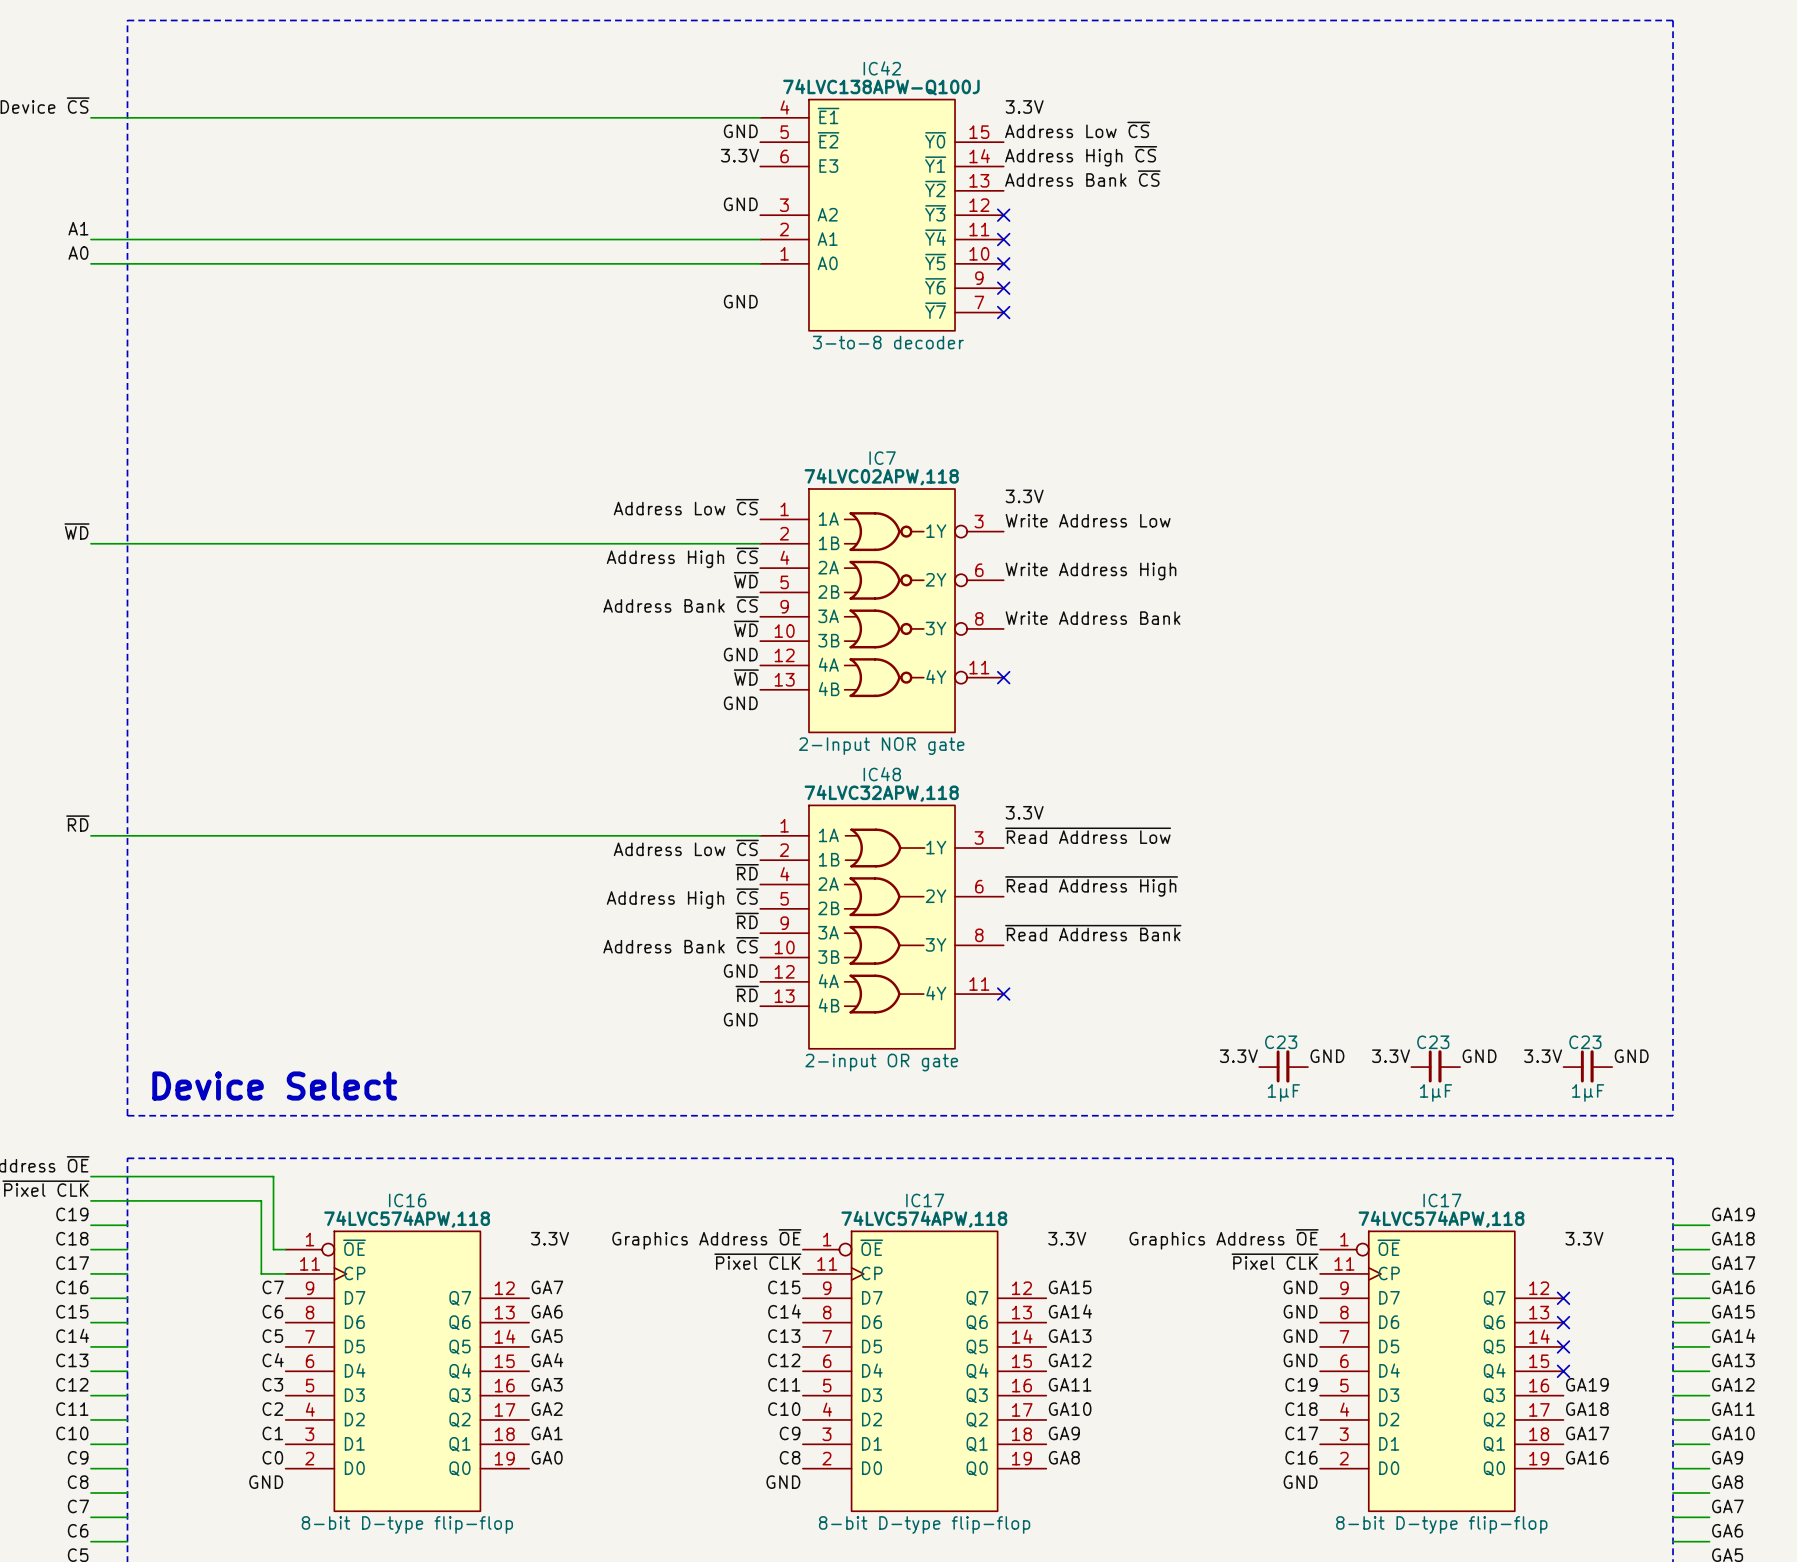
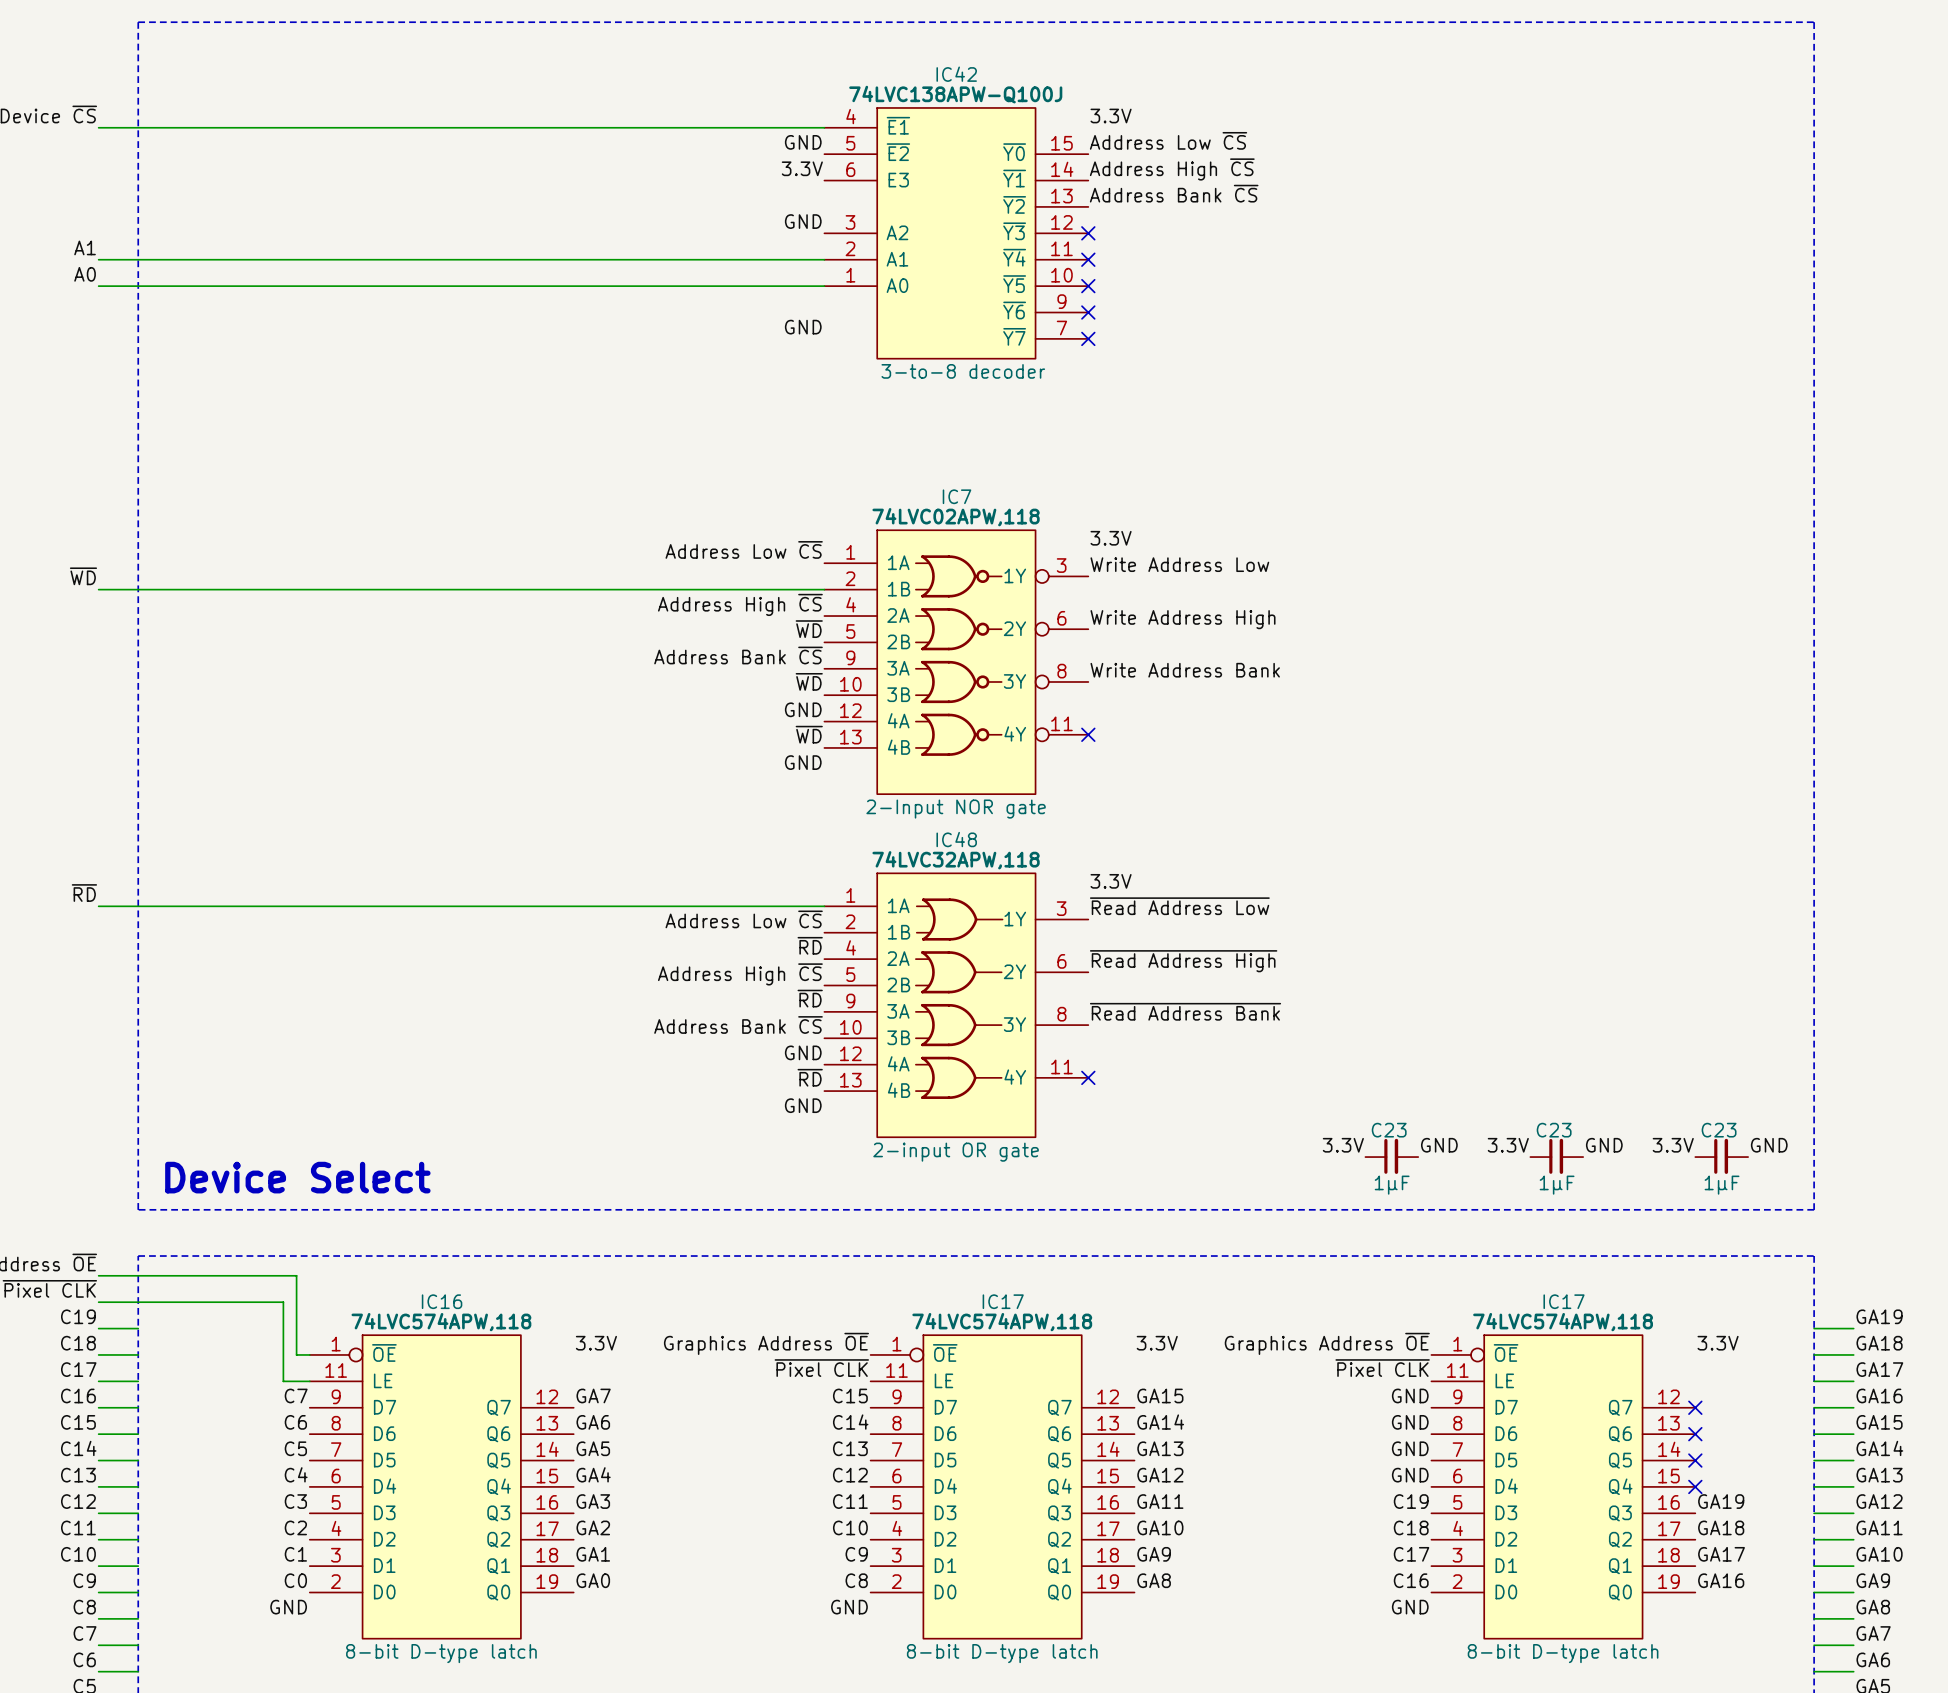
IC16 symbol: [285, 1230, 530, 1512] -> [309, 1334, 574, 1640]
IC17 symbol: [802, 1230, 1047, 1512] -> [870, 1334, 1135, 1640]
IC17 symbol: [1320, 1230, 1564, 1512] -> [1431, 1334, 1696, 1640]
IC16 text: 8-bit D-type flip-flop (407, 1524) -> 8-bit D-type latch (441, 1653)
IC17 text: 8-bit D-type flip-flop (924, 1524) -> 8-bit D-type latch (1002, 1653)
IC17 text: 8-bit D-type flip-flop (1441, 1524) -> 8-bit D-type latch (1563, 1653)

